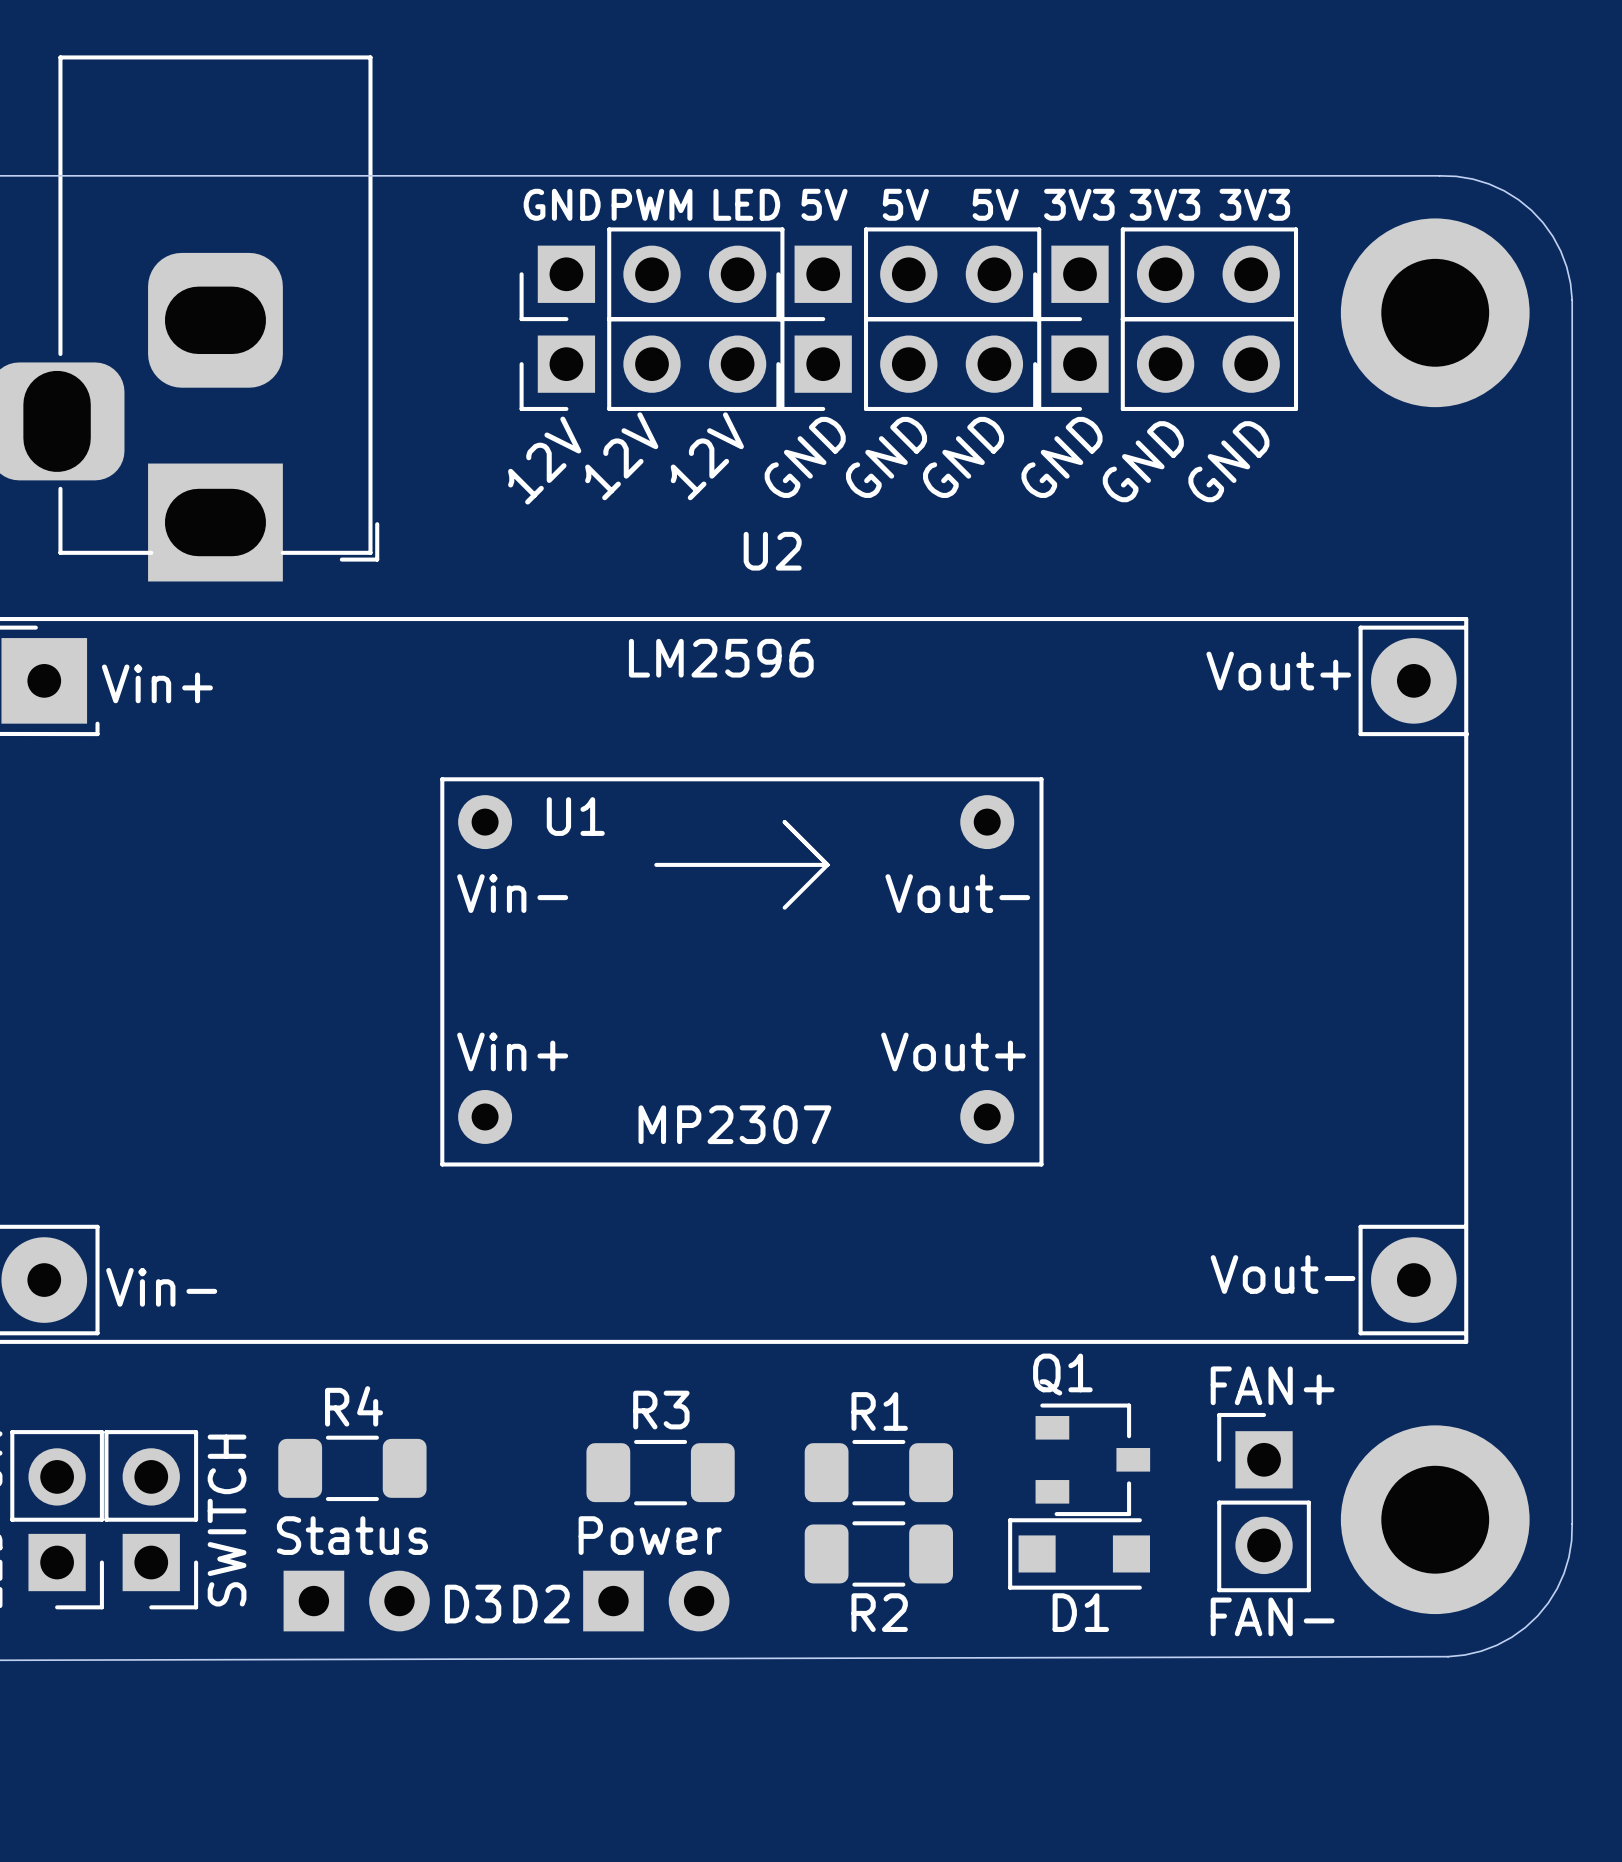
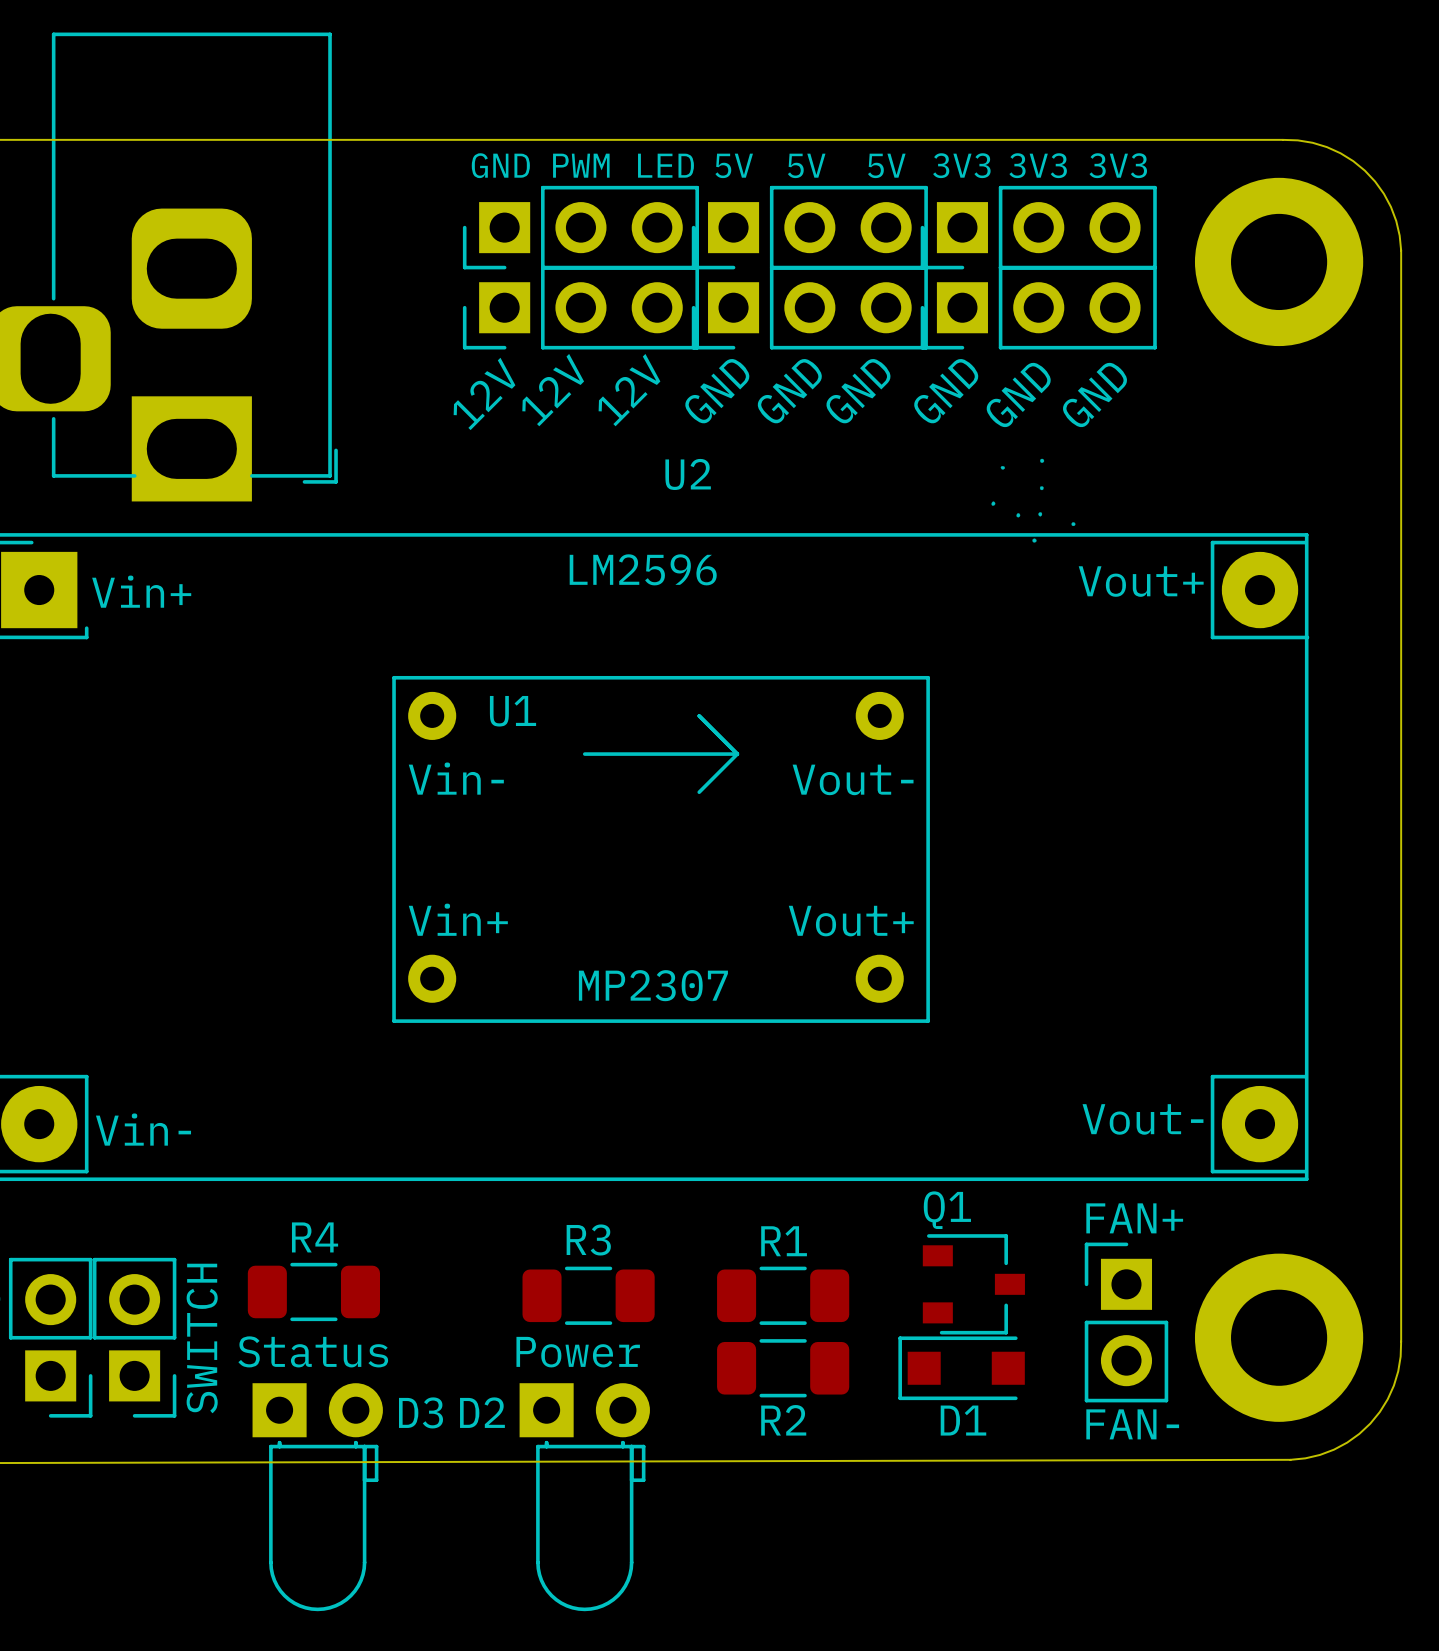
drawing: none -> [991, 458, 1076, 543]
D3 footprint: [283, 1570, 430, 1632] -> [252, 1383, 383, 1612]
D2 footprint: [583, 1570, 730, 1632] -> [519, 1383, 650, 1612]

